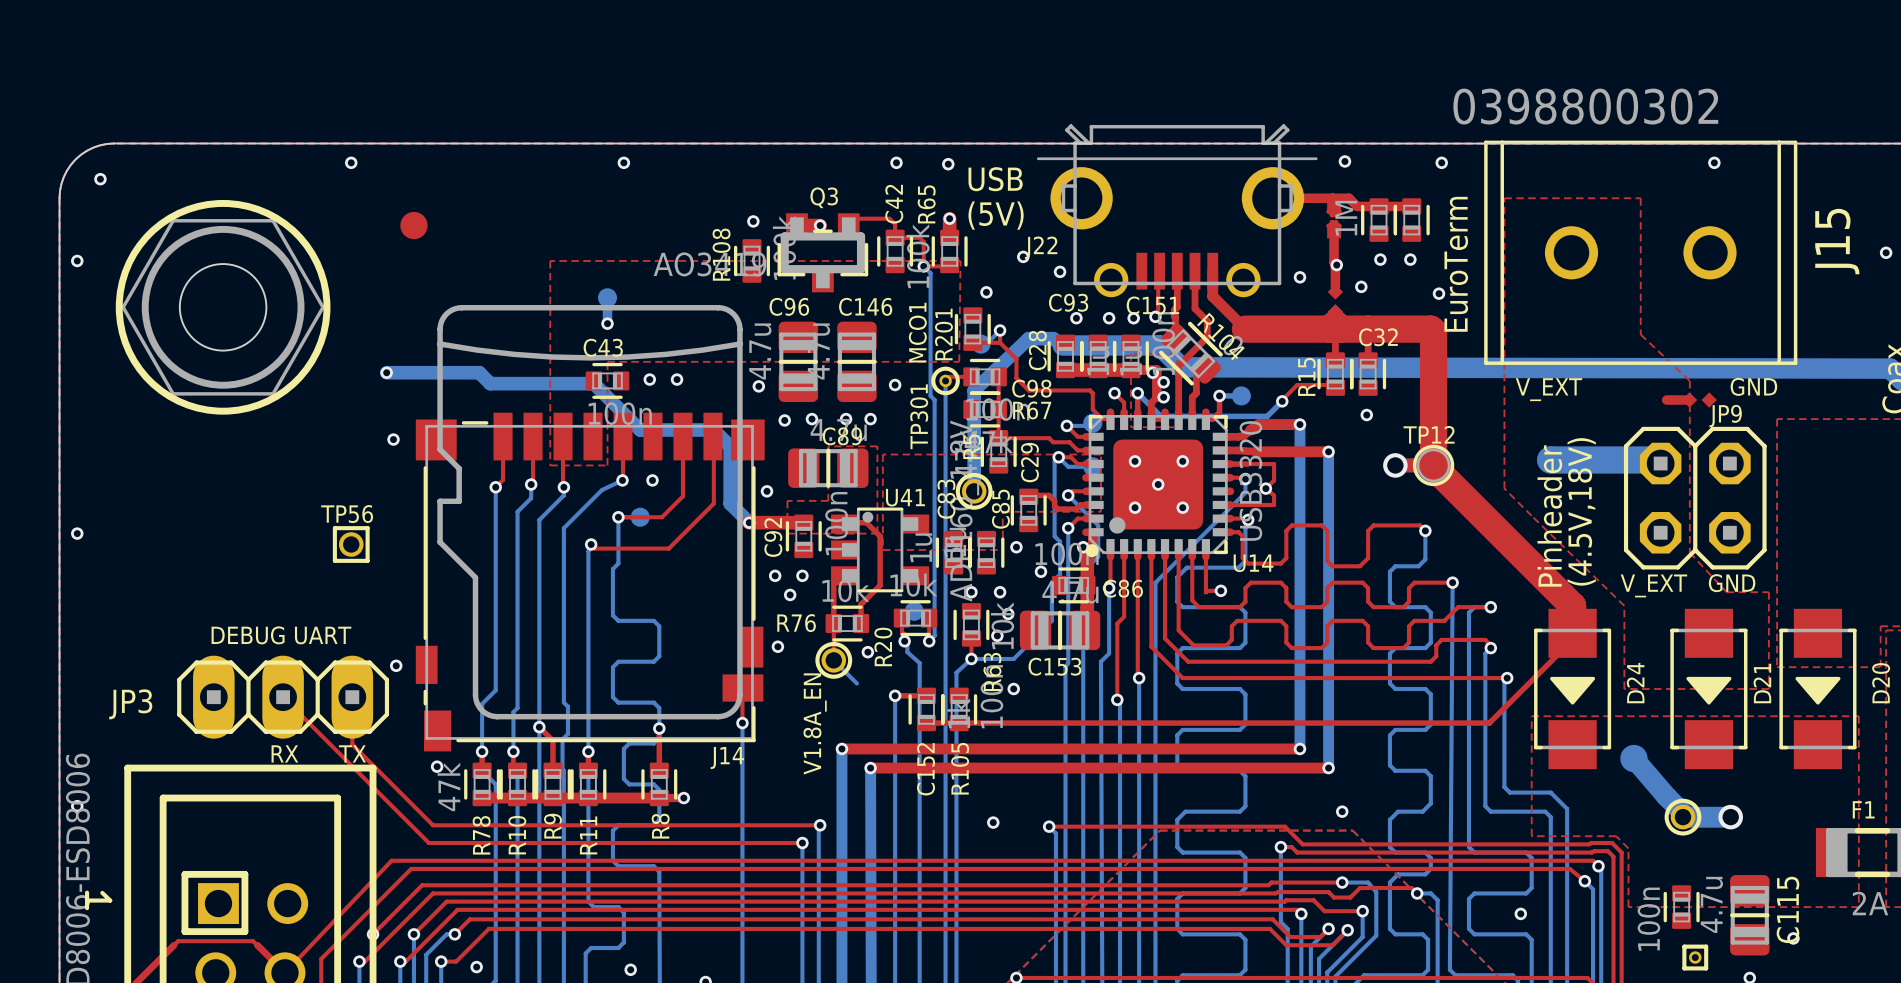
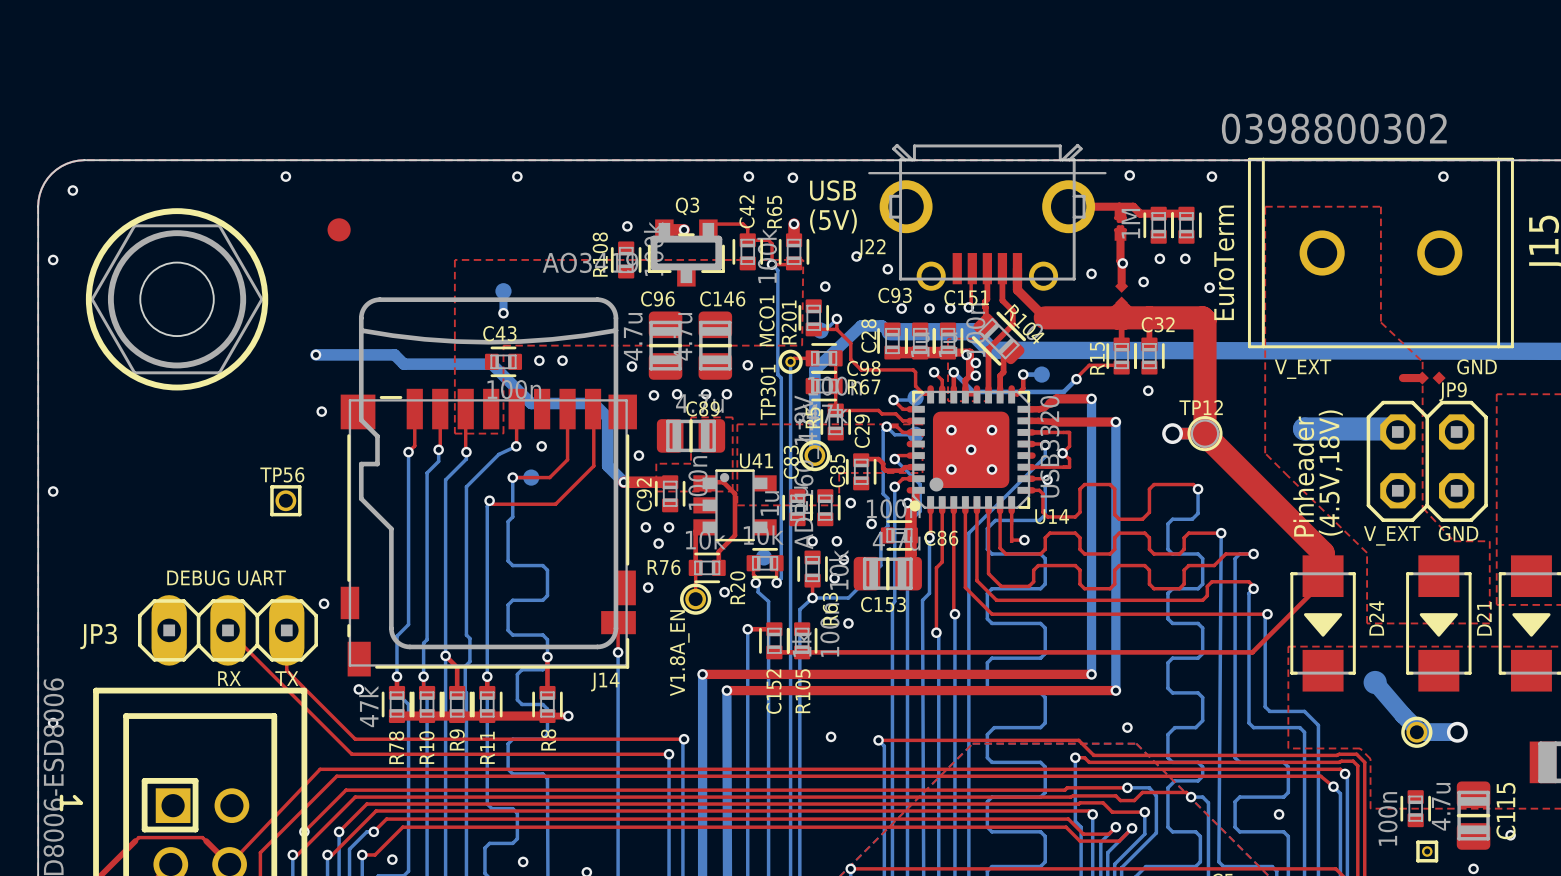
bottom track: (833, 660) (856, 683) -> none

